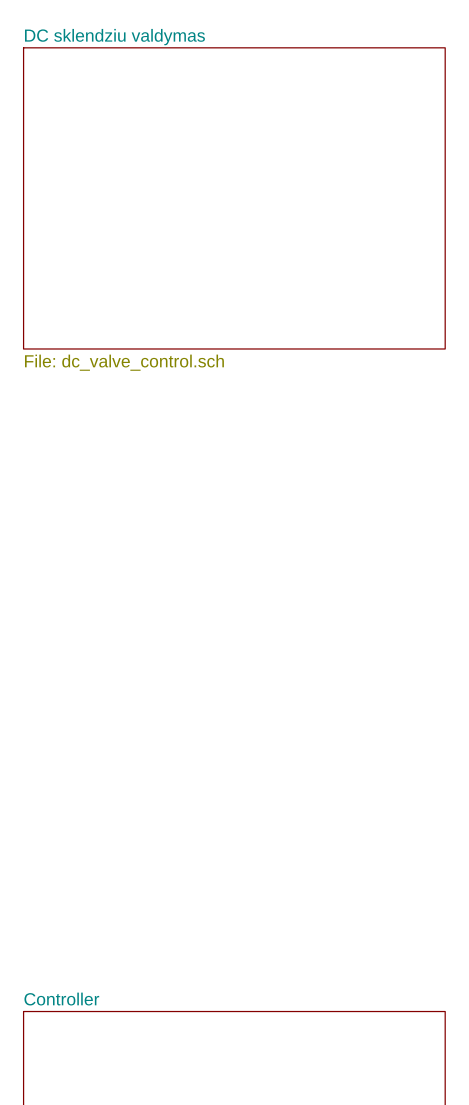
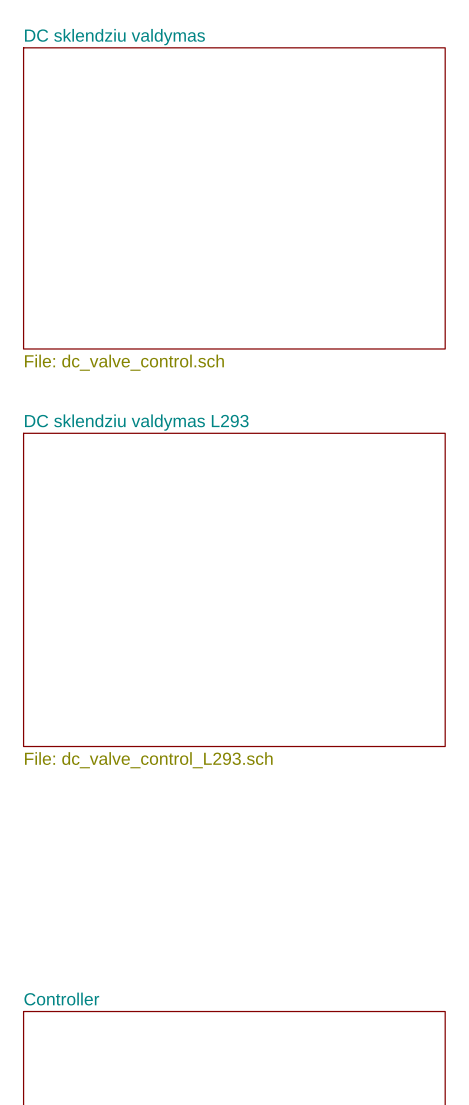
sheet DC sklendziu valdymas L293: none -> File: dc_valve_control_L293.sch (234, 589)

